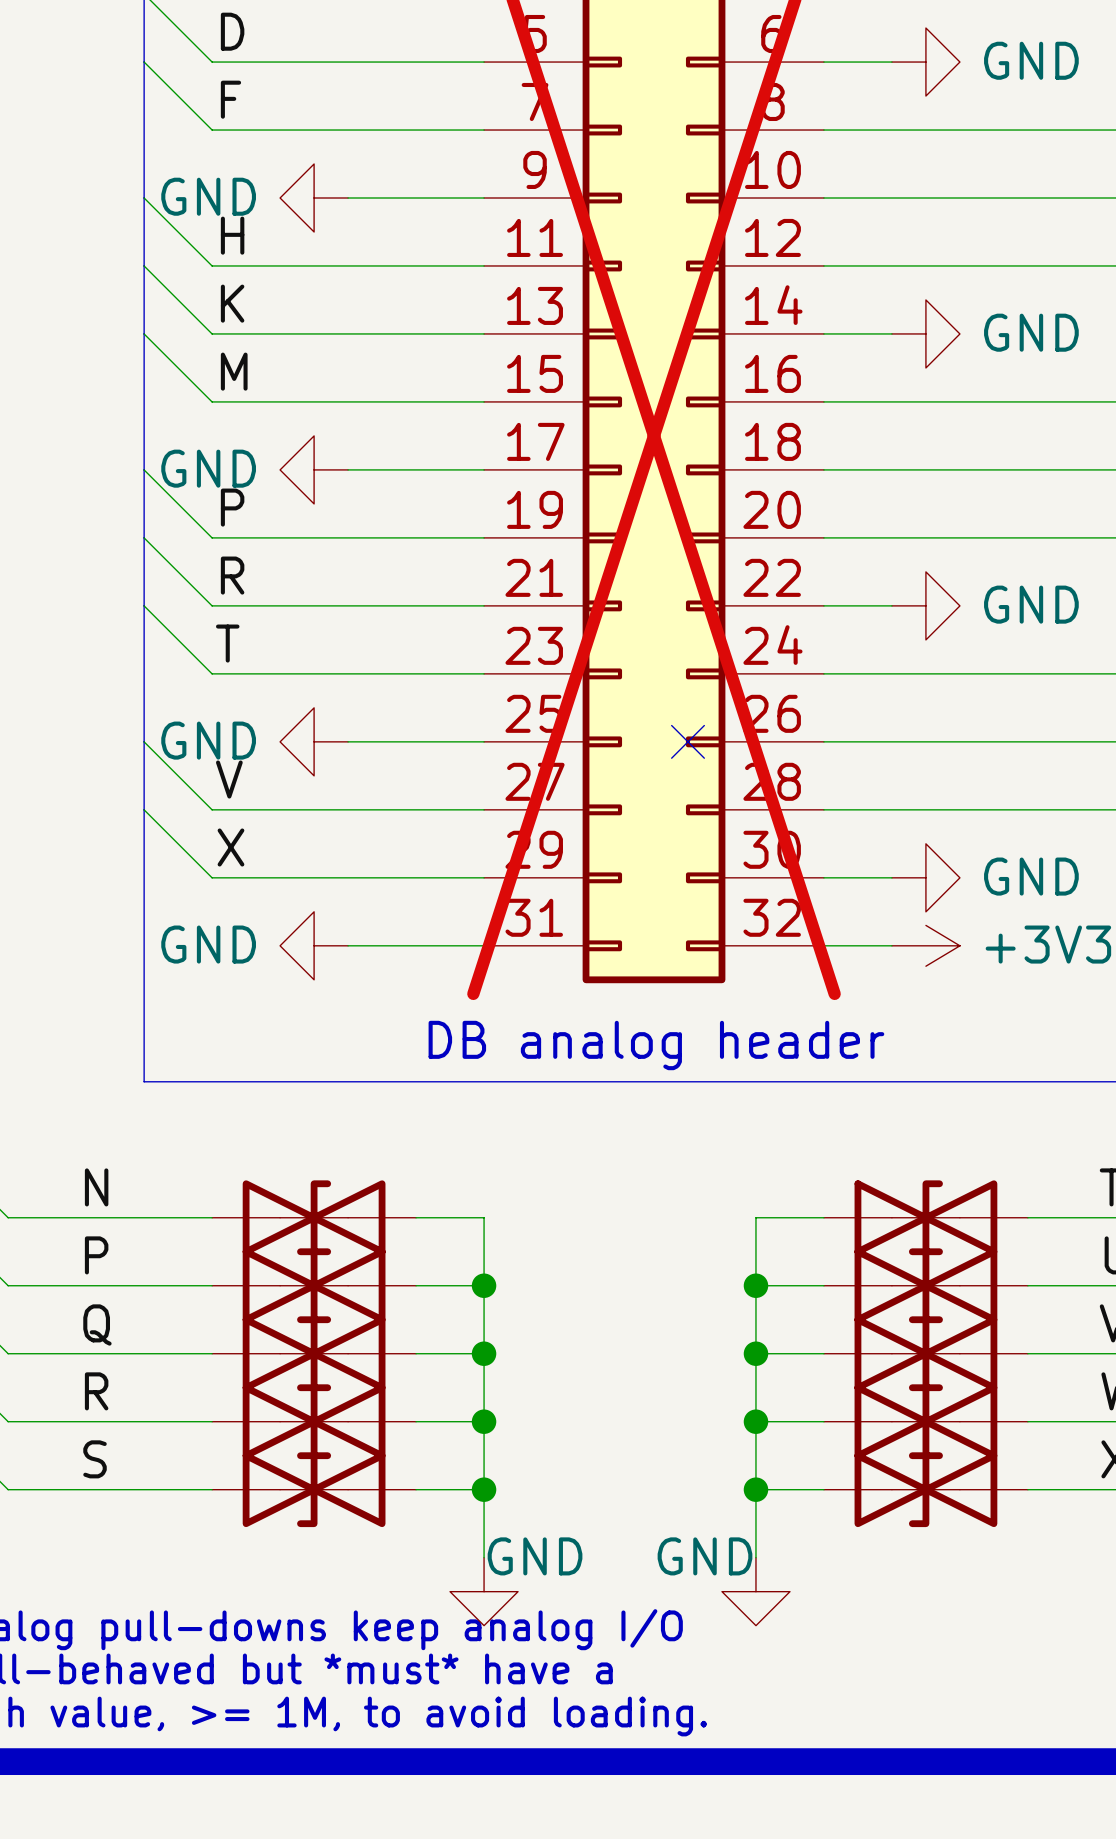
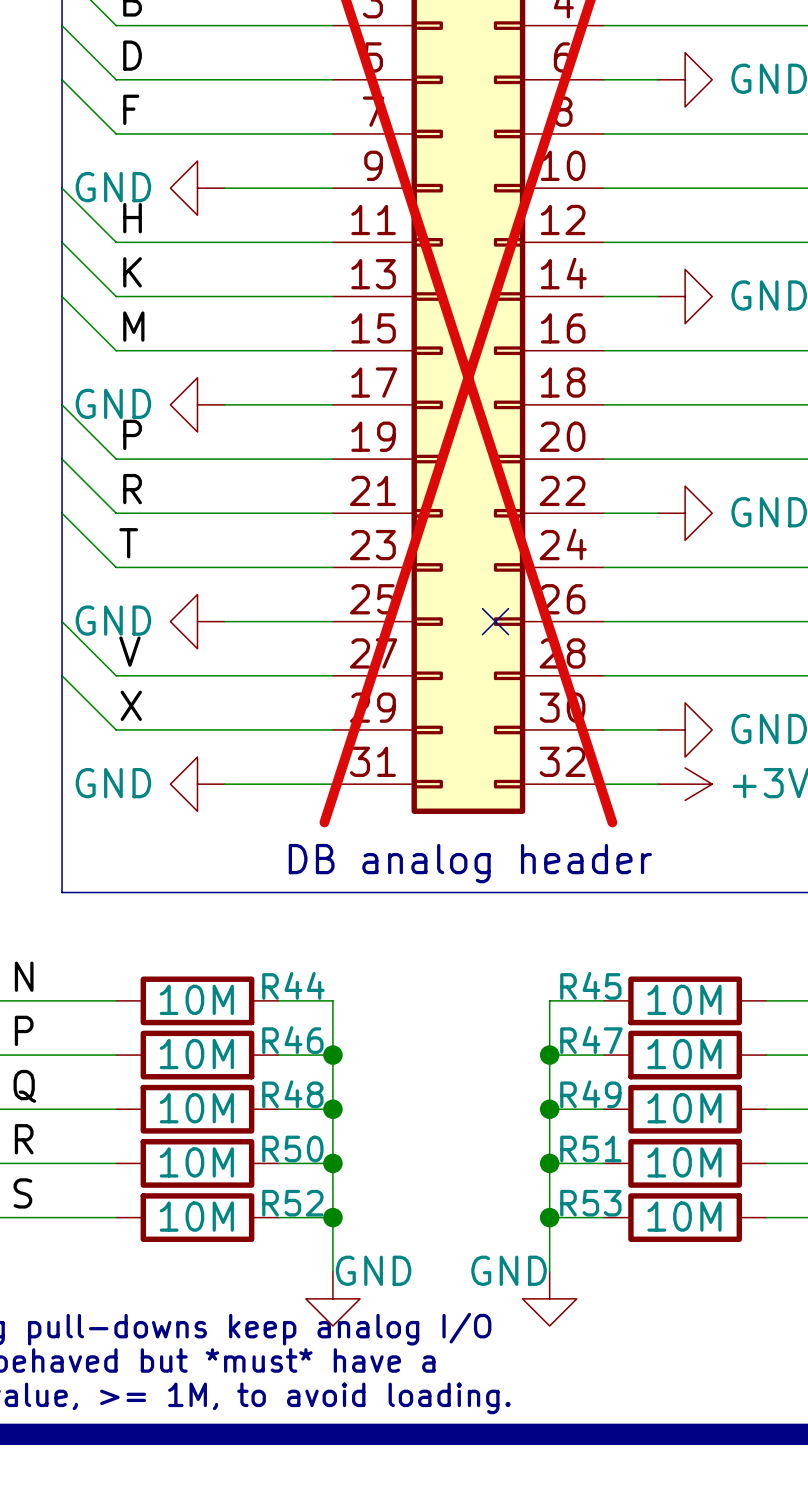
part: (314, 1217) -> none
R44: none -> 10M (197, 1000)
part: (925, 1217) -> none
R45: none -> 10M (685, 1000)
part: (314, 1285) -> none
R46: none -> 10M (197, 1055)
part: (925, 1285) -> none
R47: none -> 10M (685, 1055)
part: (314, 1353) -> none
R48: none -> 10M (197, 1109)
part: (925, 1353) -> none
R49: none -> 10M (685, 1109)
part: (314, 1421) -> none
R50: none -> 10M (197, 1163)
part: (925, 1421) -> none
R51: none -> 10M (685, 1163)
part: (314, 1489) -> none
R52: none -> 10M (197, 1217)
part: (925, 1489) -> none
R53: none -> 10M (685, 1217)

